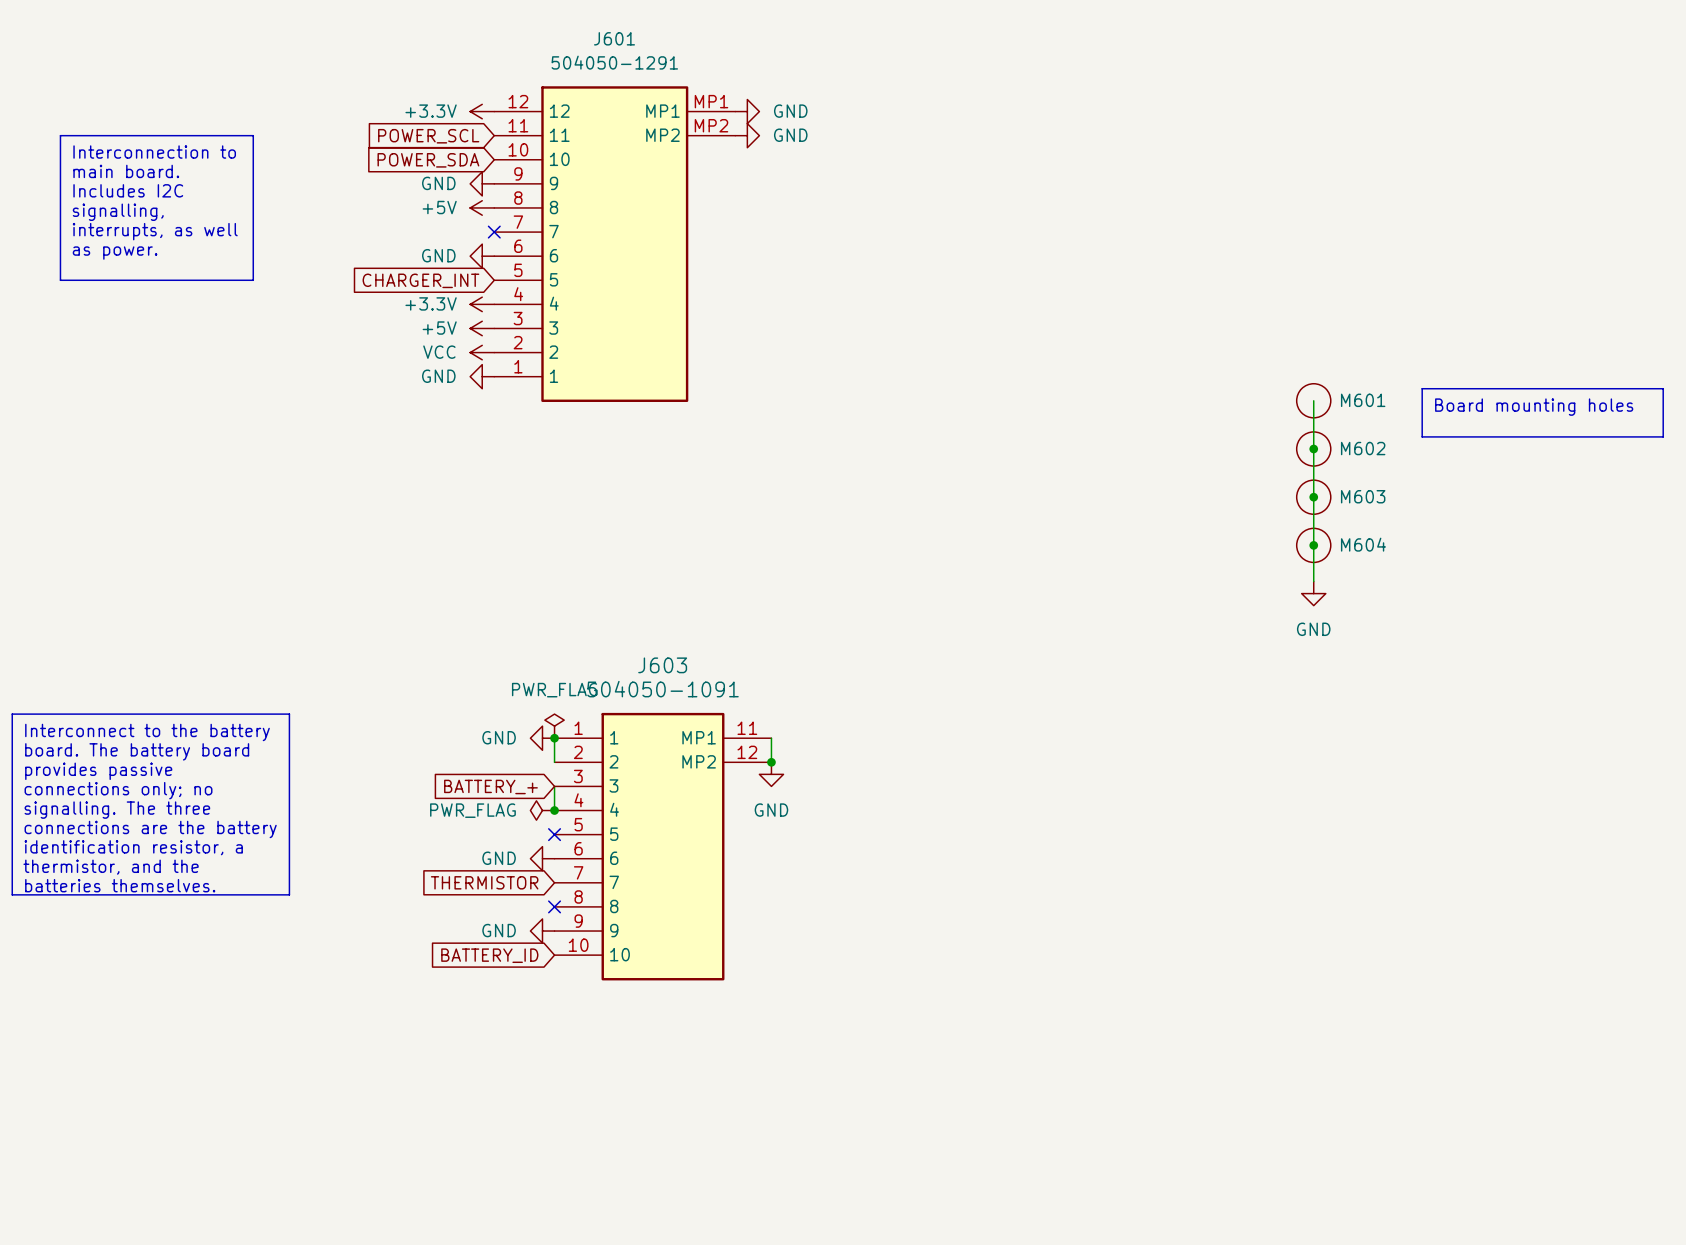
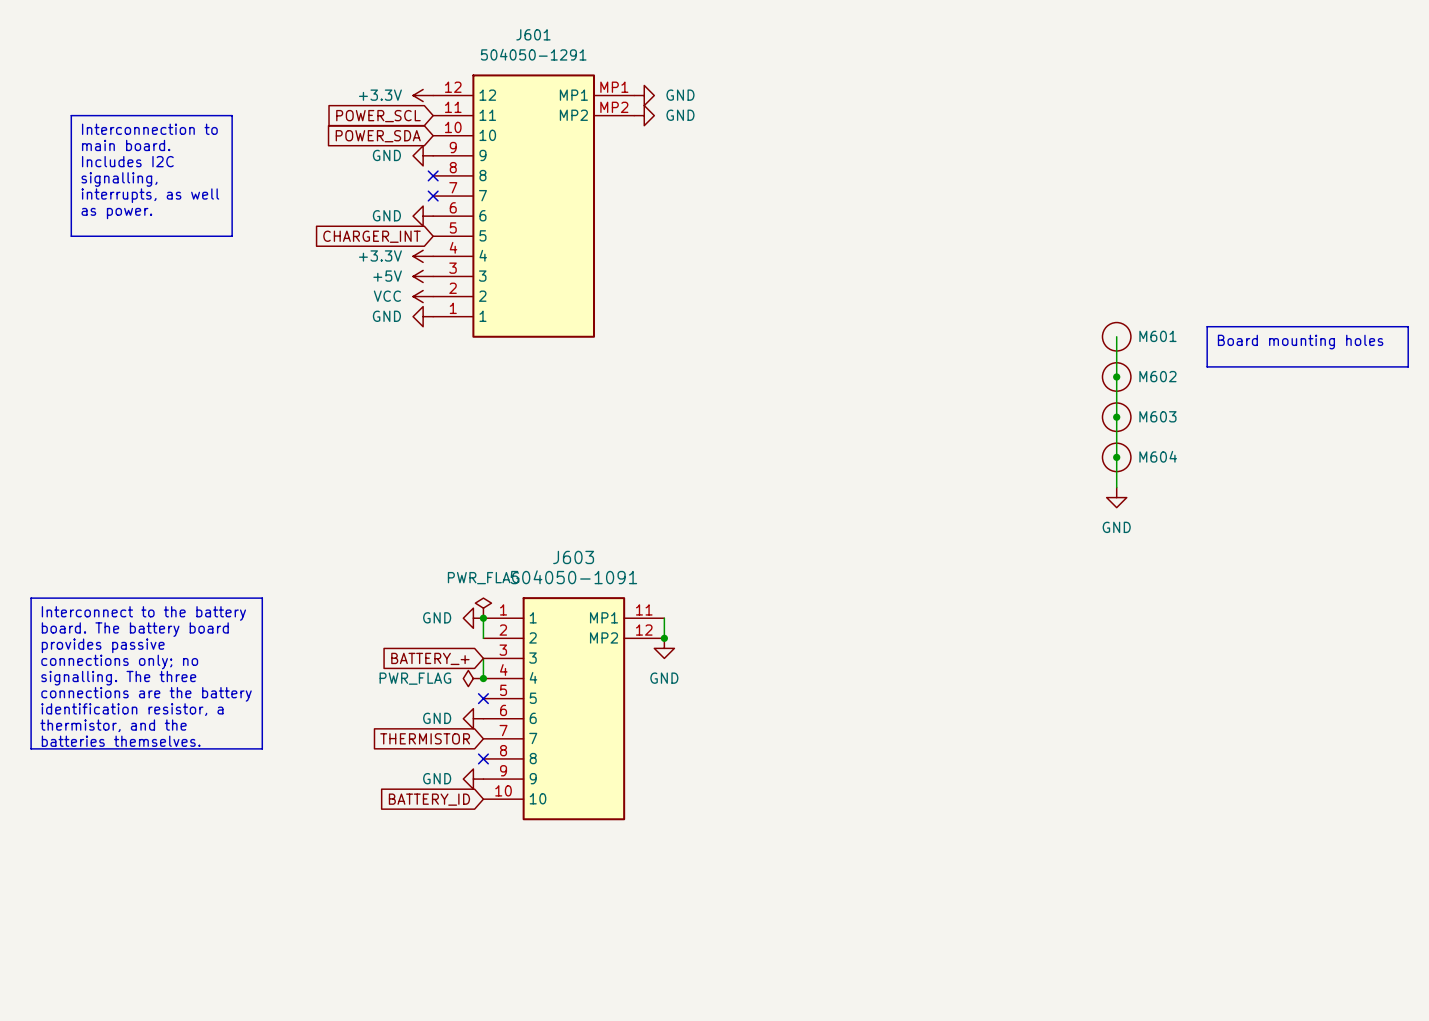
power symbol: +5V (482, 207) -> none
no-connect mark: none -> (433, 175)

